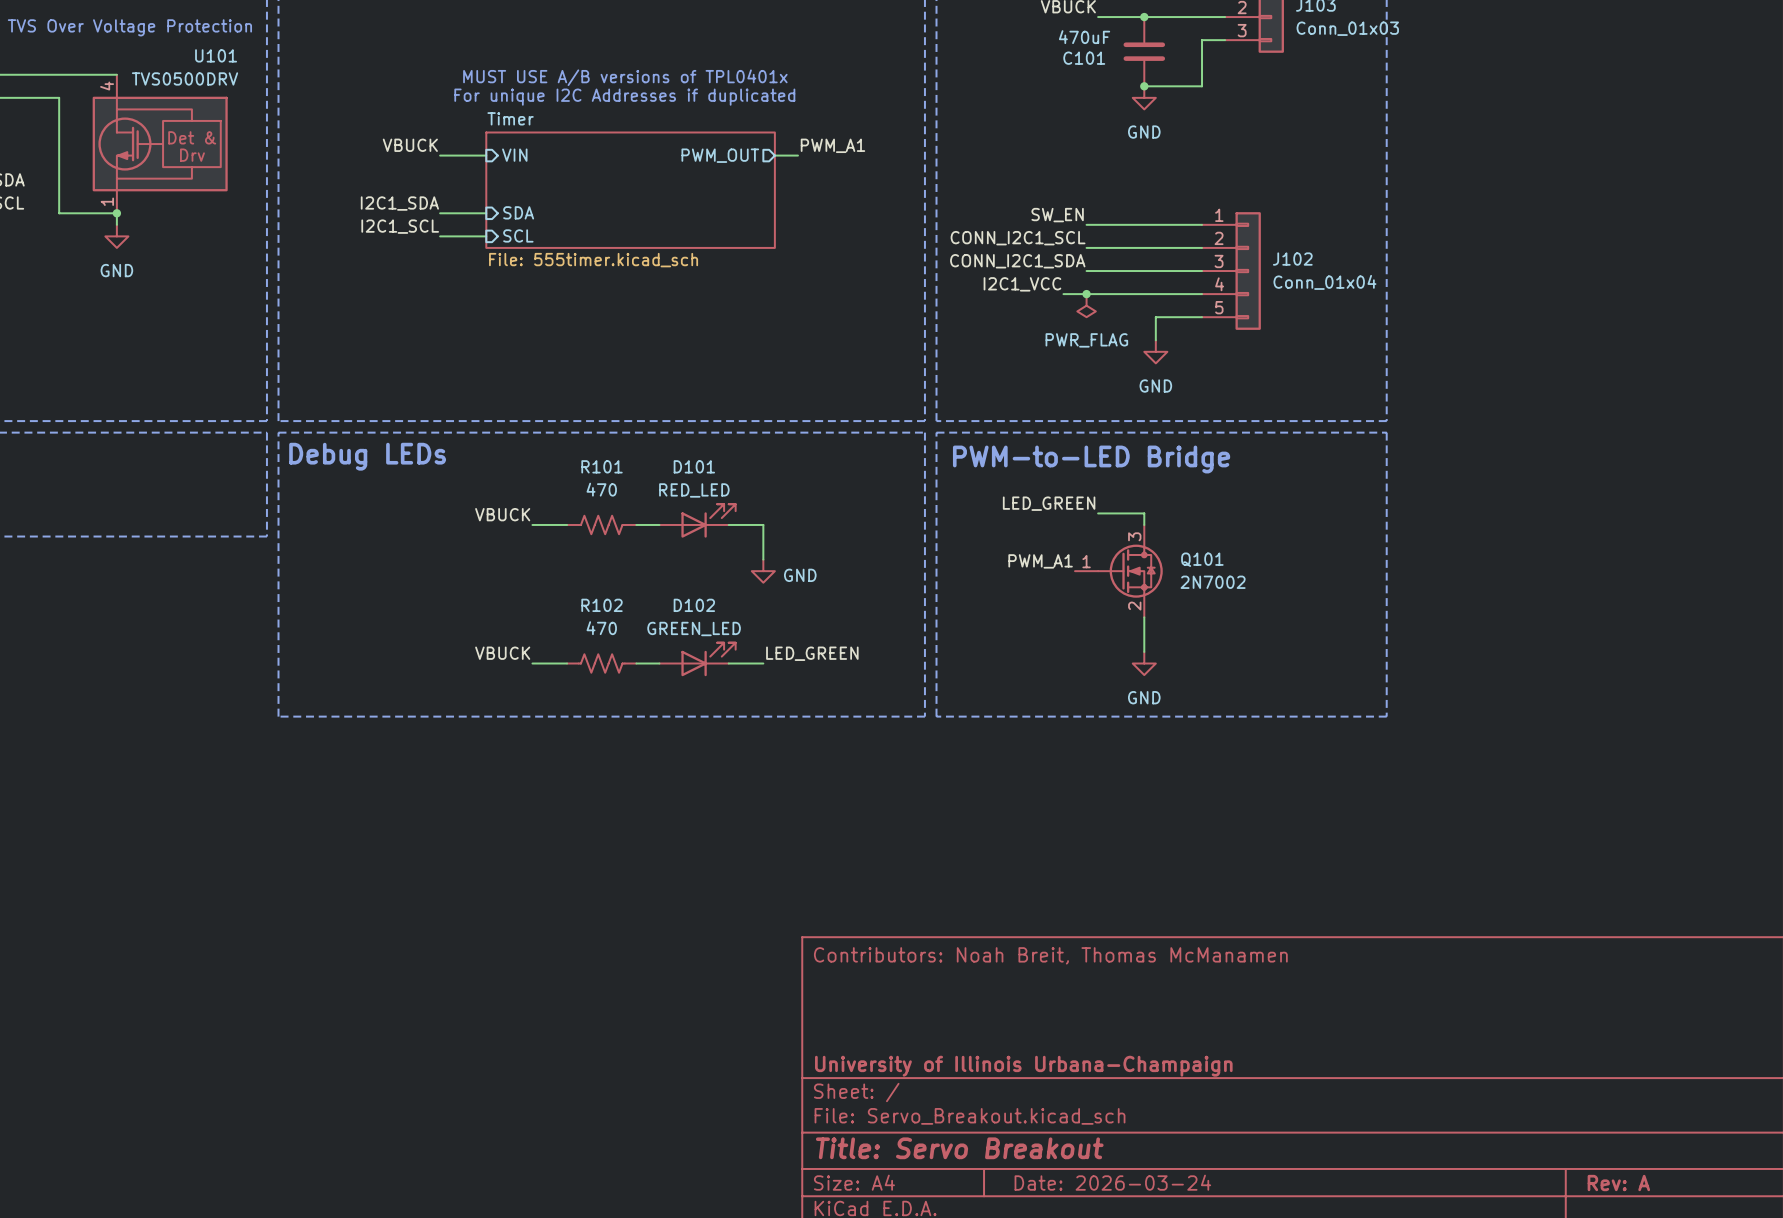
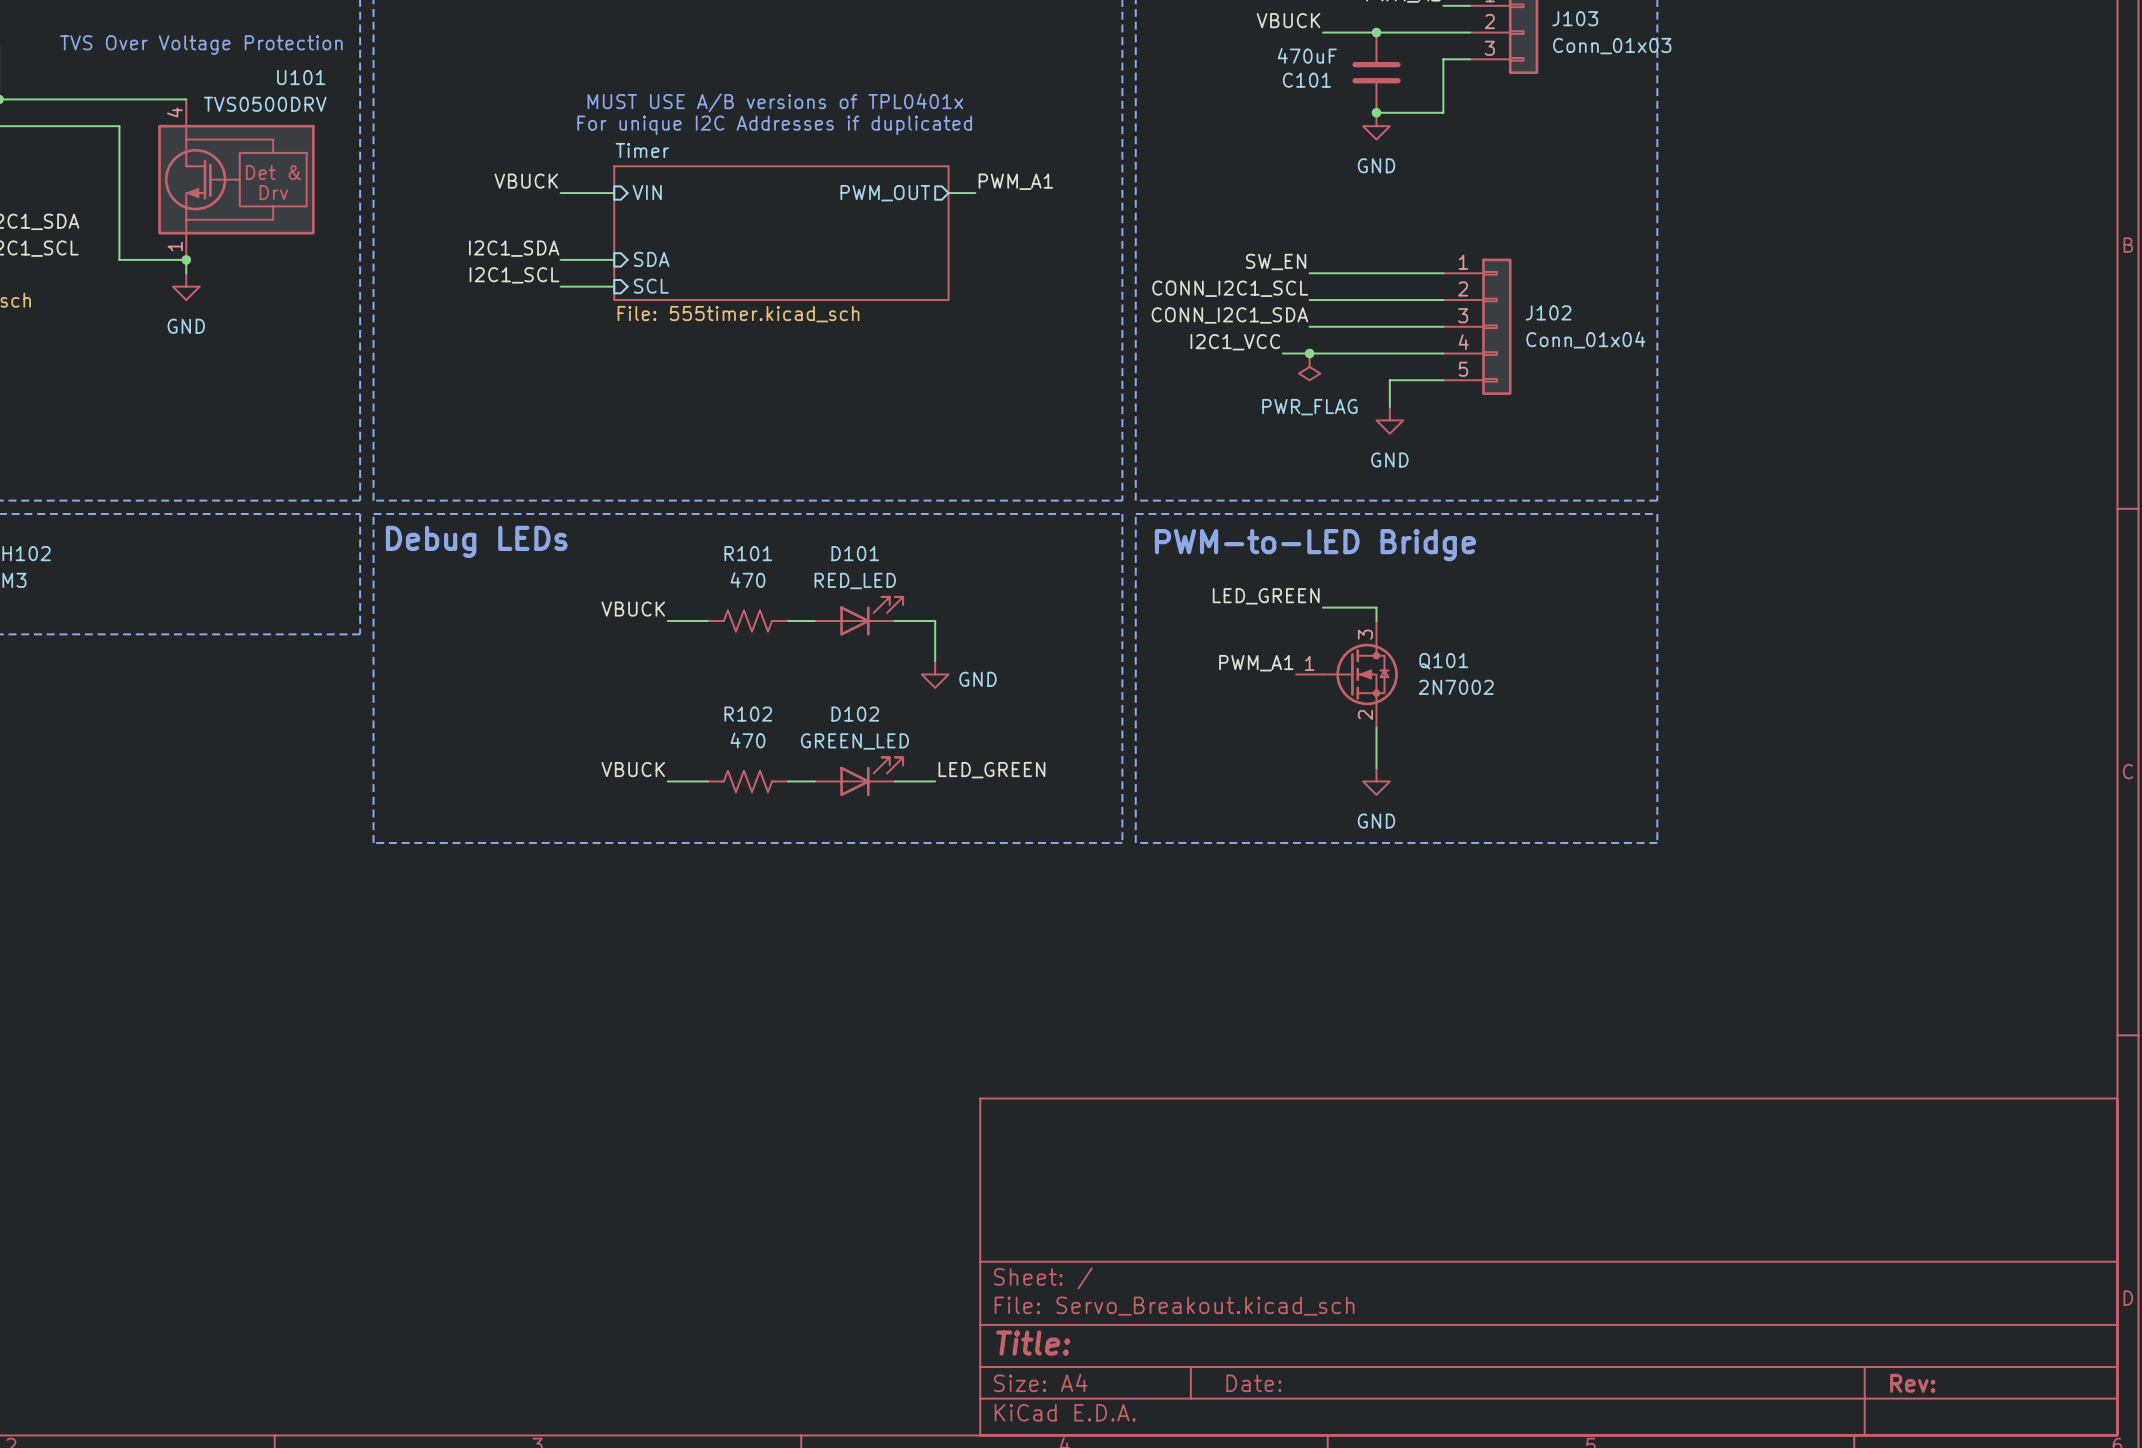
title block: Contributors: Noah Breit, Thomas McManamen (1050, 955) -> none
title block: University of Illinois Urbana-Champaign (1023, 1066) -> none
title block: Title: Servo Breakout (959, 1148) -> Title: (1033, 1343)
title block: Date: 2026-03-24 (1112, 1182) -> Date: (1253, 1383)
title block: Rev: A (1618, 1183) -> Rev: (1912, 1383)

